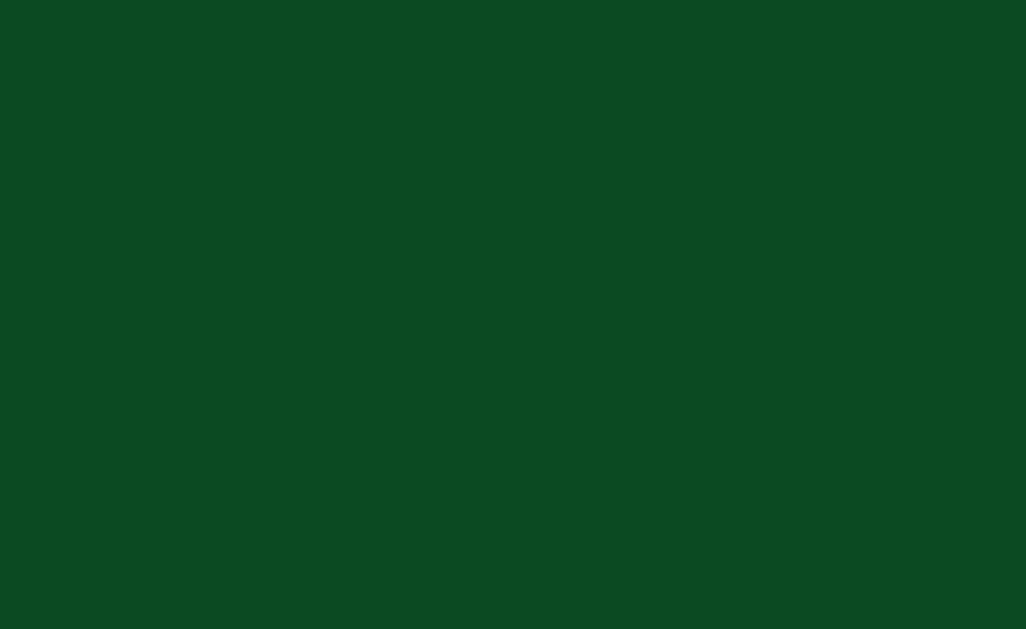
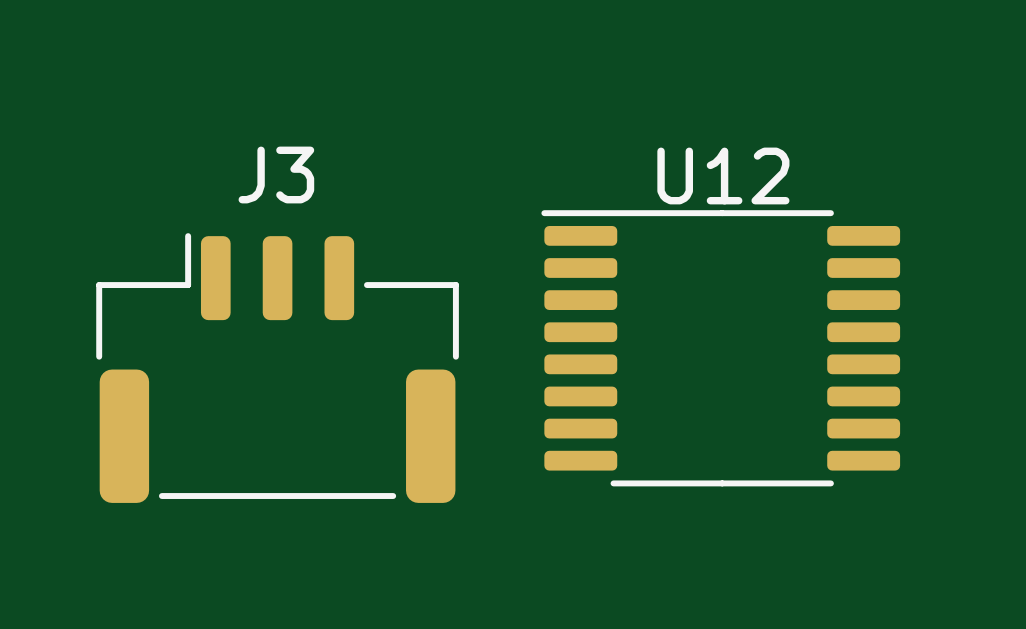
U12: none -> (720, 348)
J3: none -> (277, 368)

